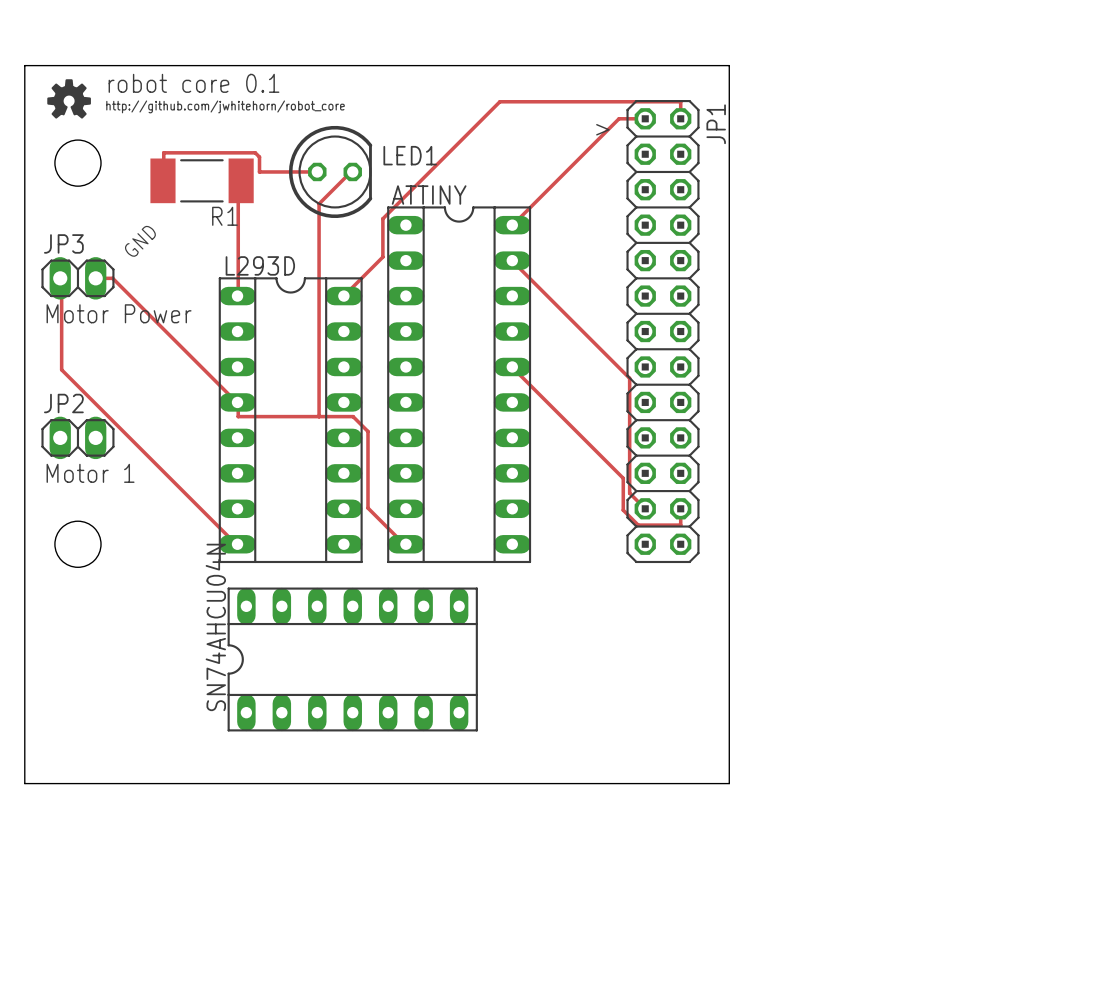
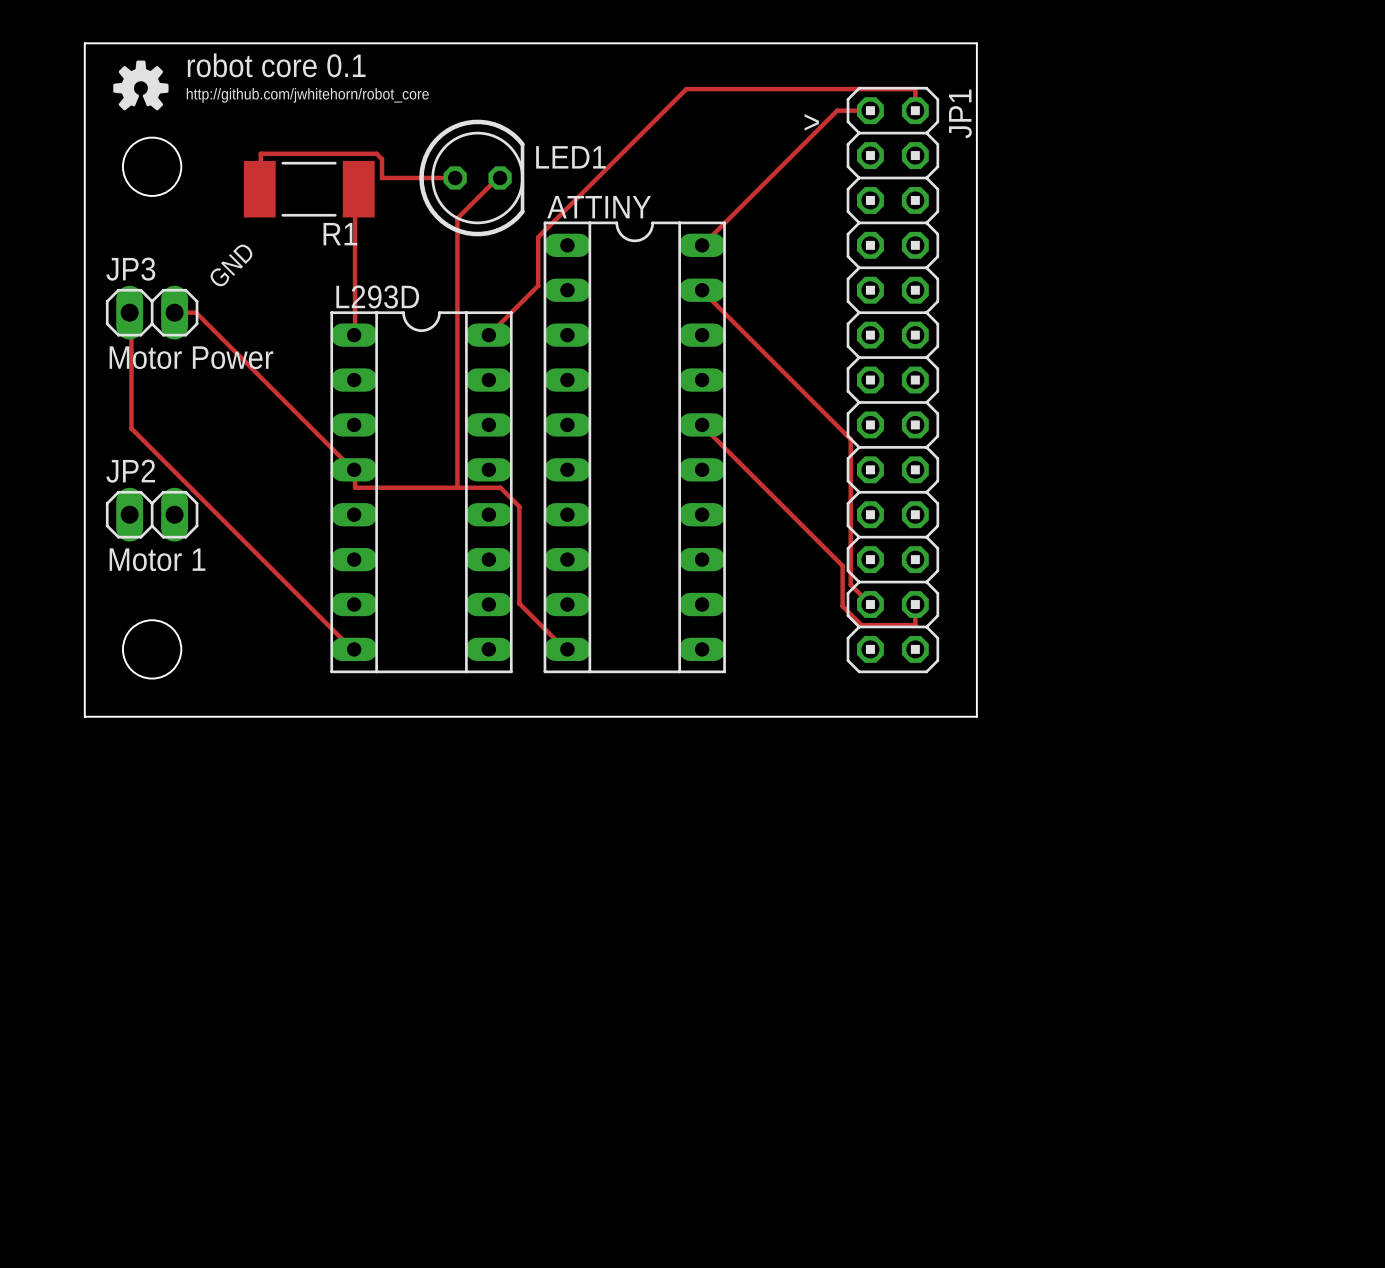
board edge: (24, 597) (24, 783) (729, 783) (729, 597) -> (84, 716) (976, 716)
SN74AHCU04N: (352, 659) -> none

